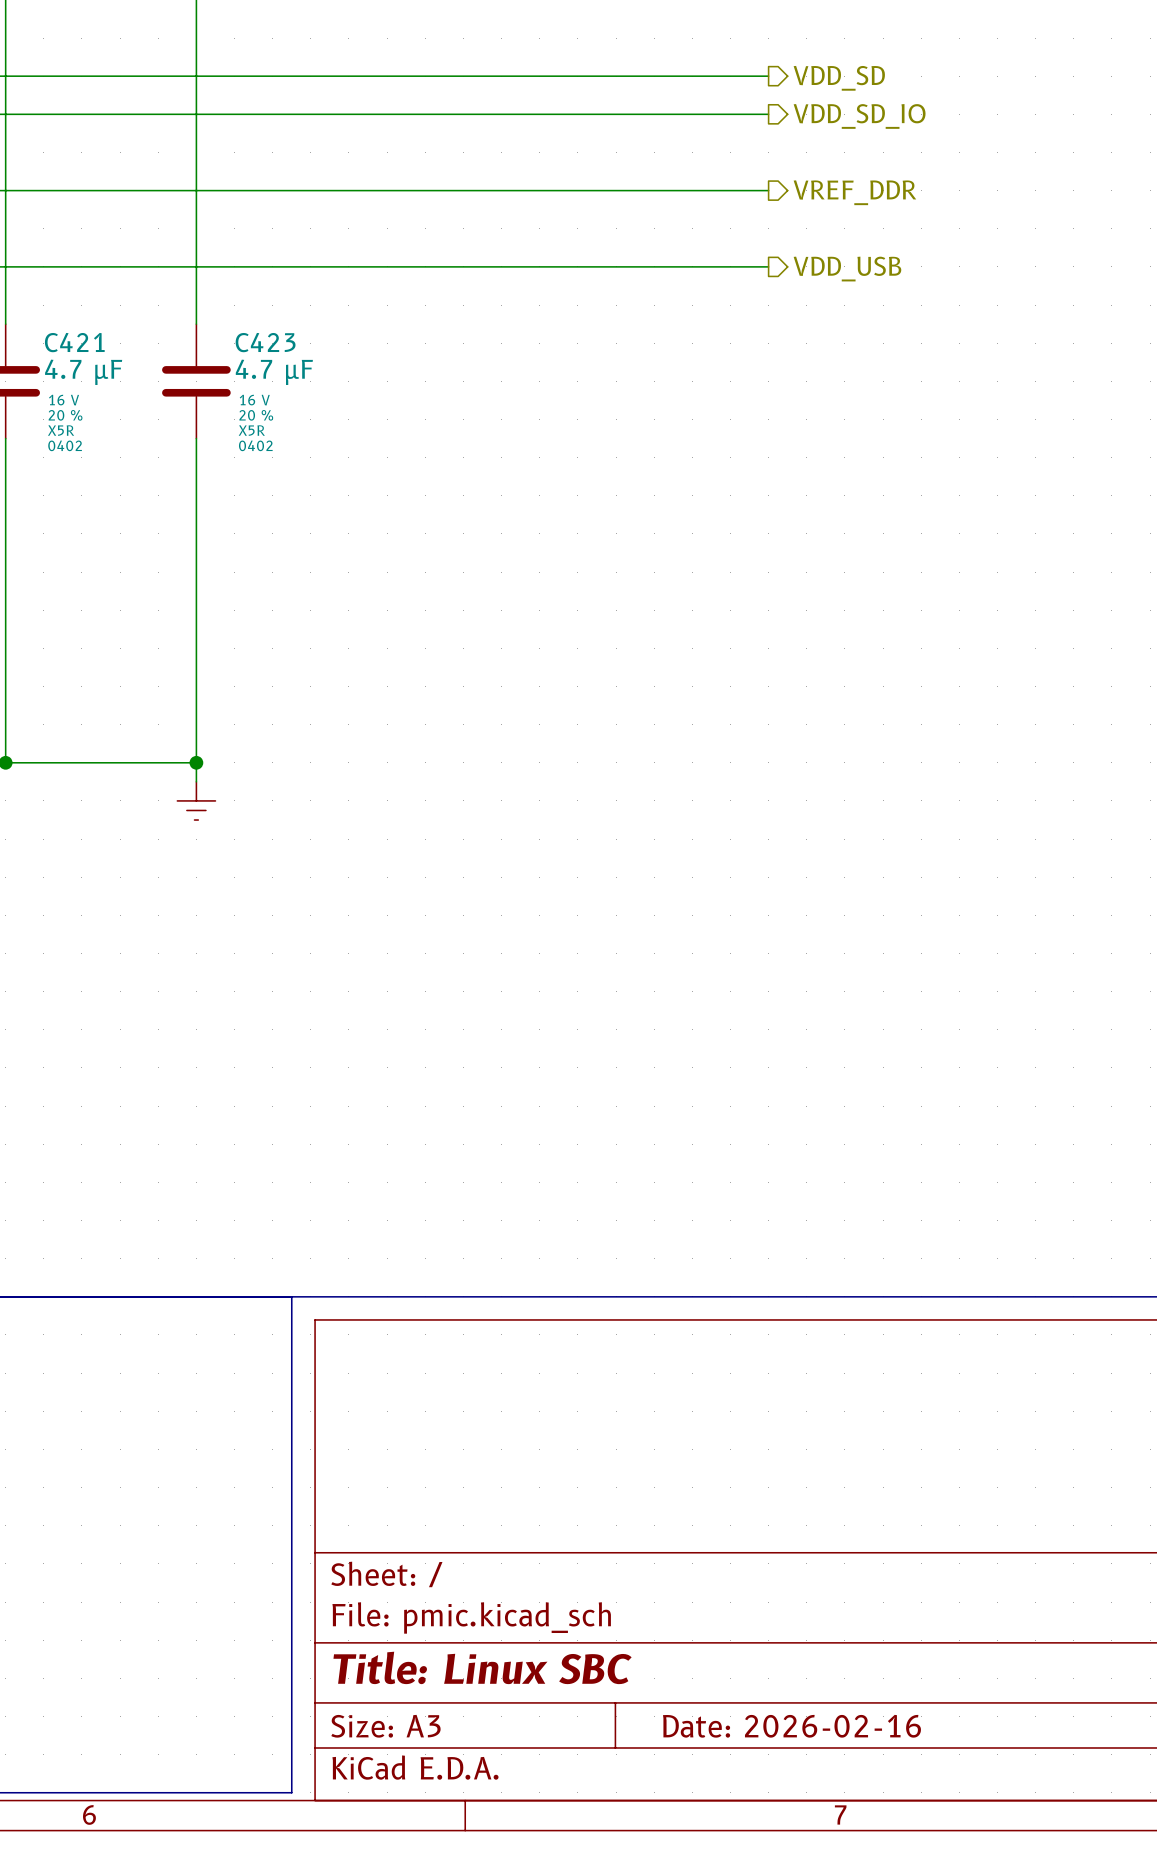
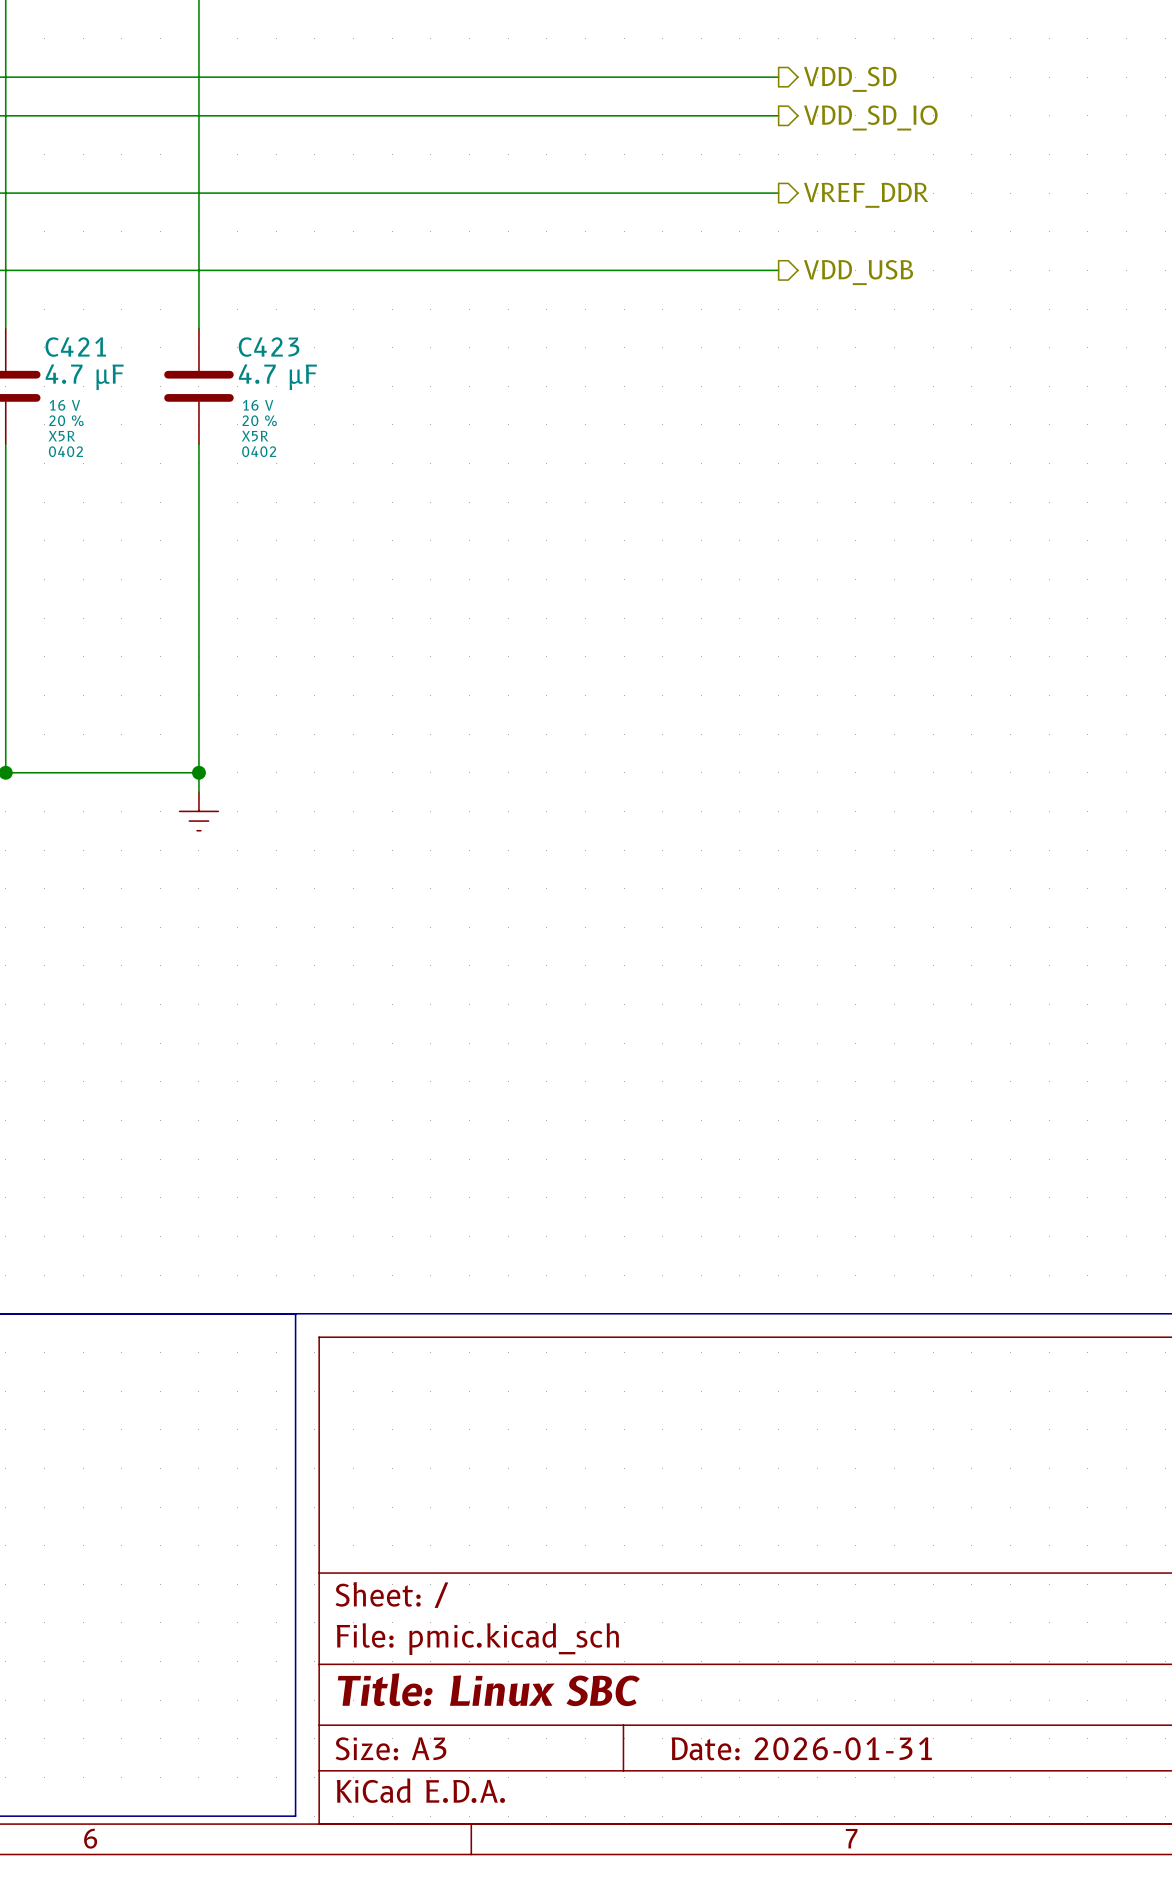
title block: Date: 2026-02-16 (791, 1726) -> Date: 2026-01-31 (801, 1748)

